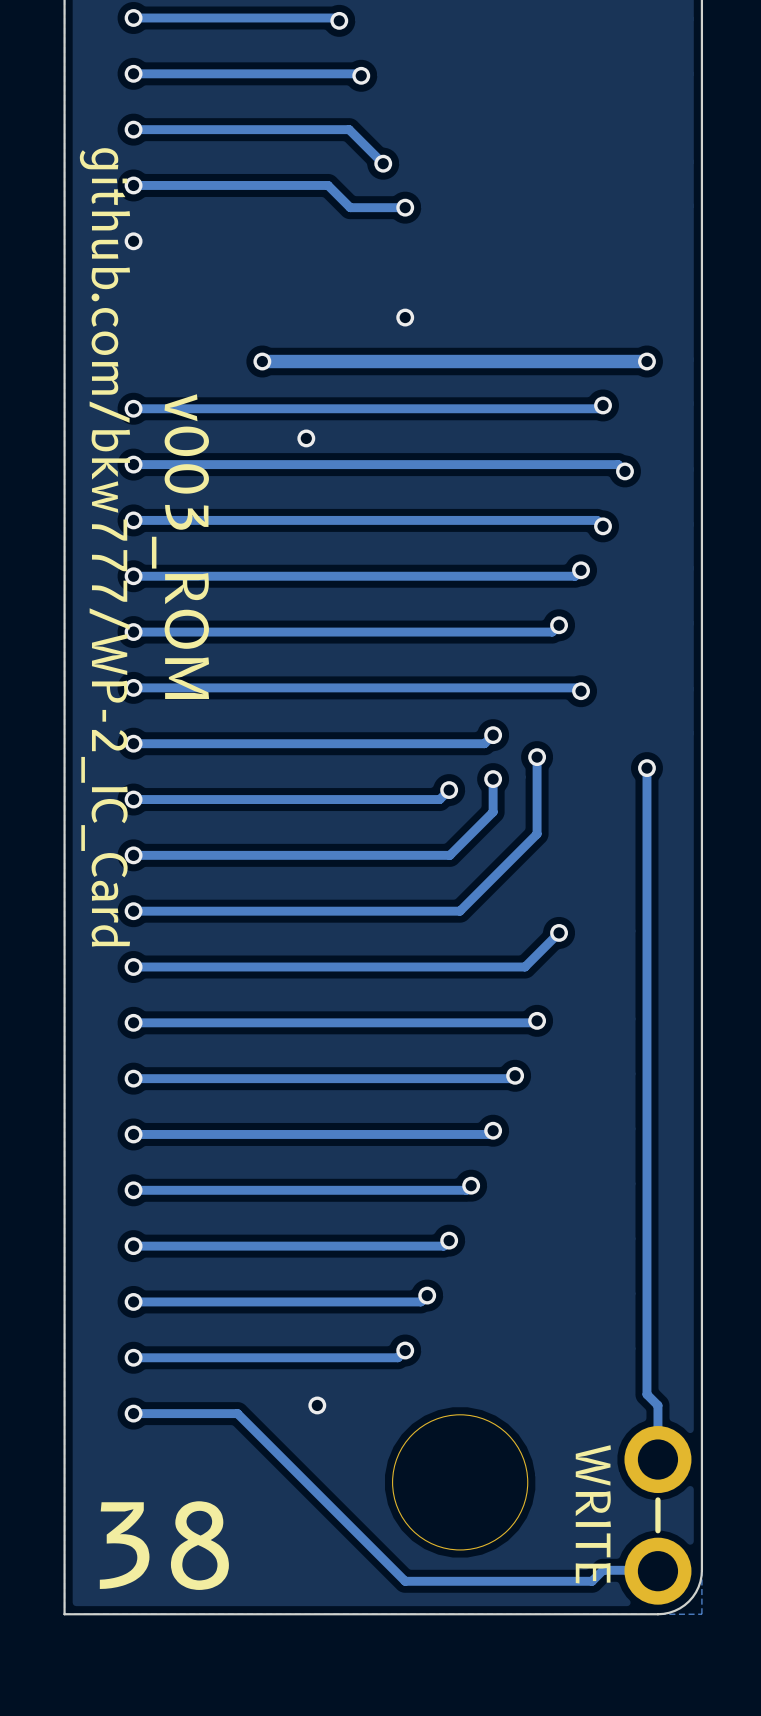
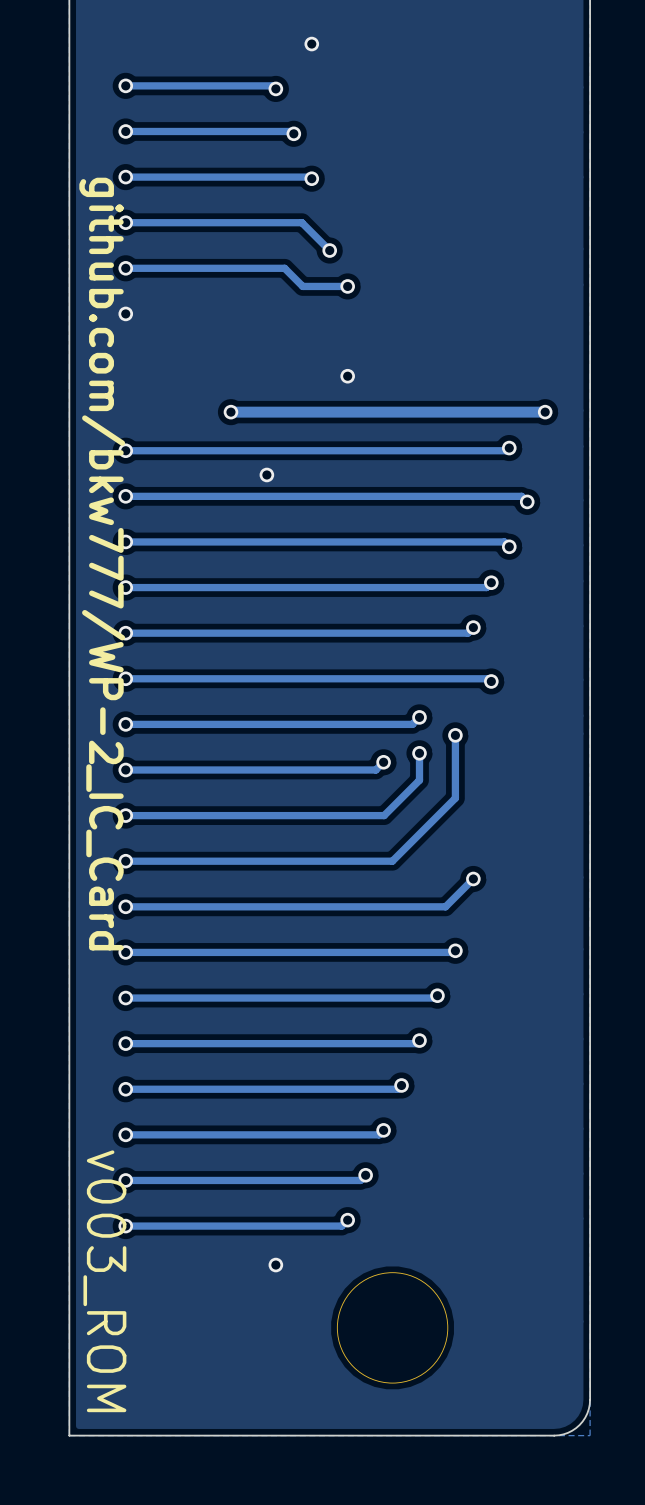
text position: v003_ROM (180, 546) -> v003_ROM (104, 1281)
track: (646, 768) (646, 1394) (657, 1405) (657, 1459) -> none
via: (646, 768) -> none
track: (133, 1413) (237, 1413) (405, 1581) (592, 1581) (603, 1570) (657, 1571) -> none
via: (133, 1413) -> none
line: (657, 1499) (657, 1530) -> none
text: WRITE (593, 1514) -> none
part: (657, 1515) -> none
text: 38 (164, 1545) -> none

